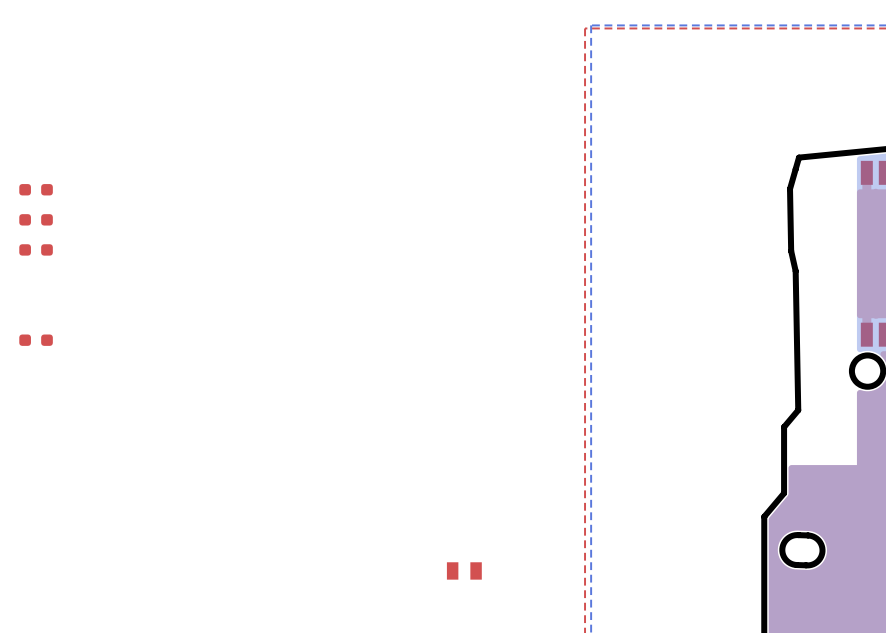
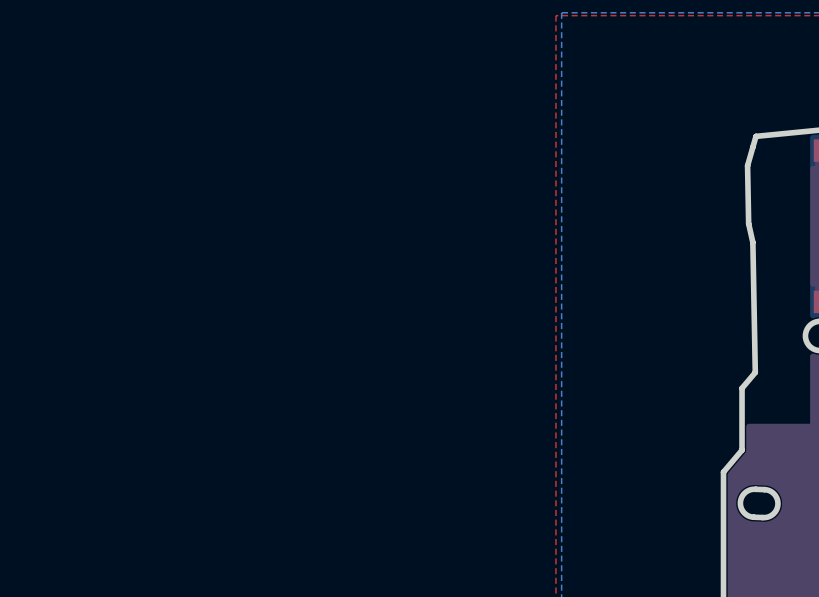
part: (36, 189) -> none
part: (36, 219) -> none
part: (36, 249) -> none
part: (36, 340) -> none
part: (464, 570) -> none

